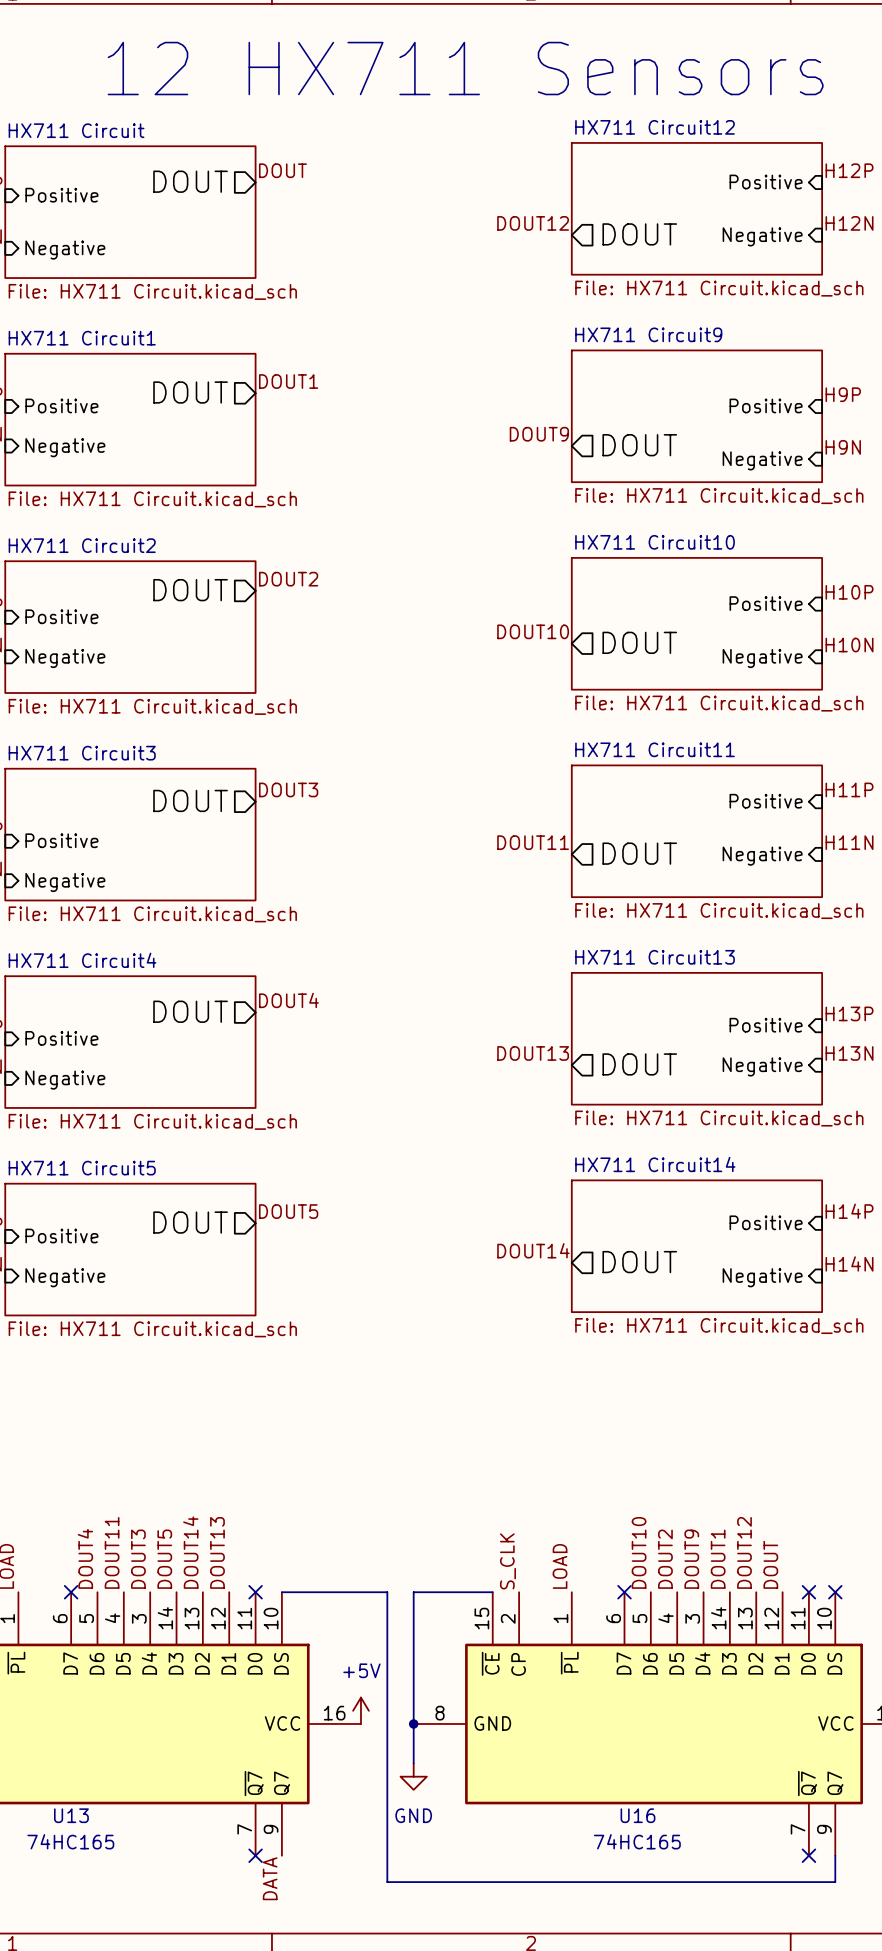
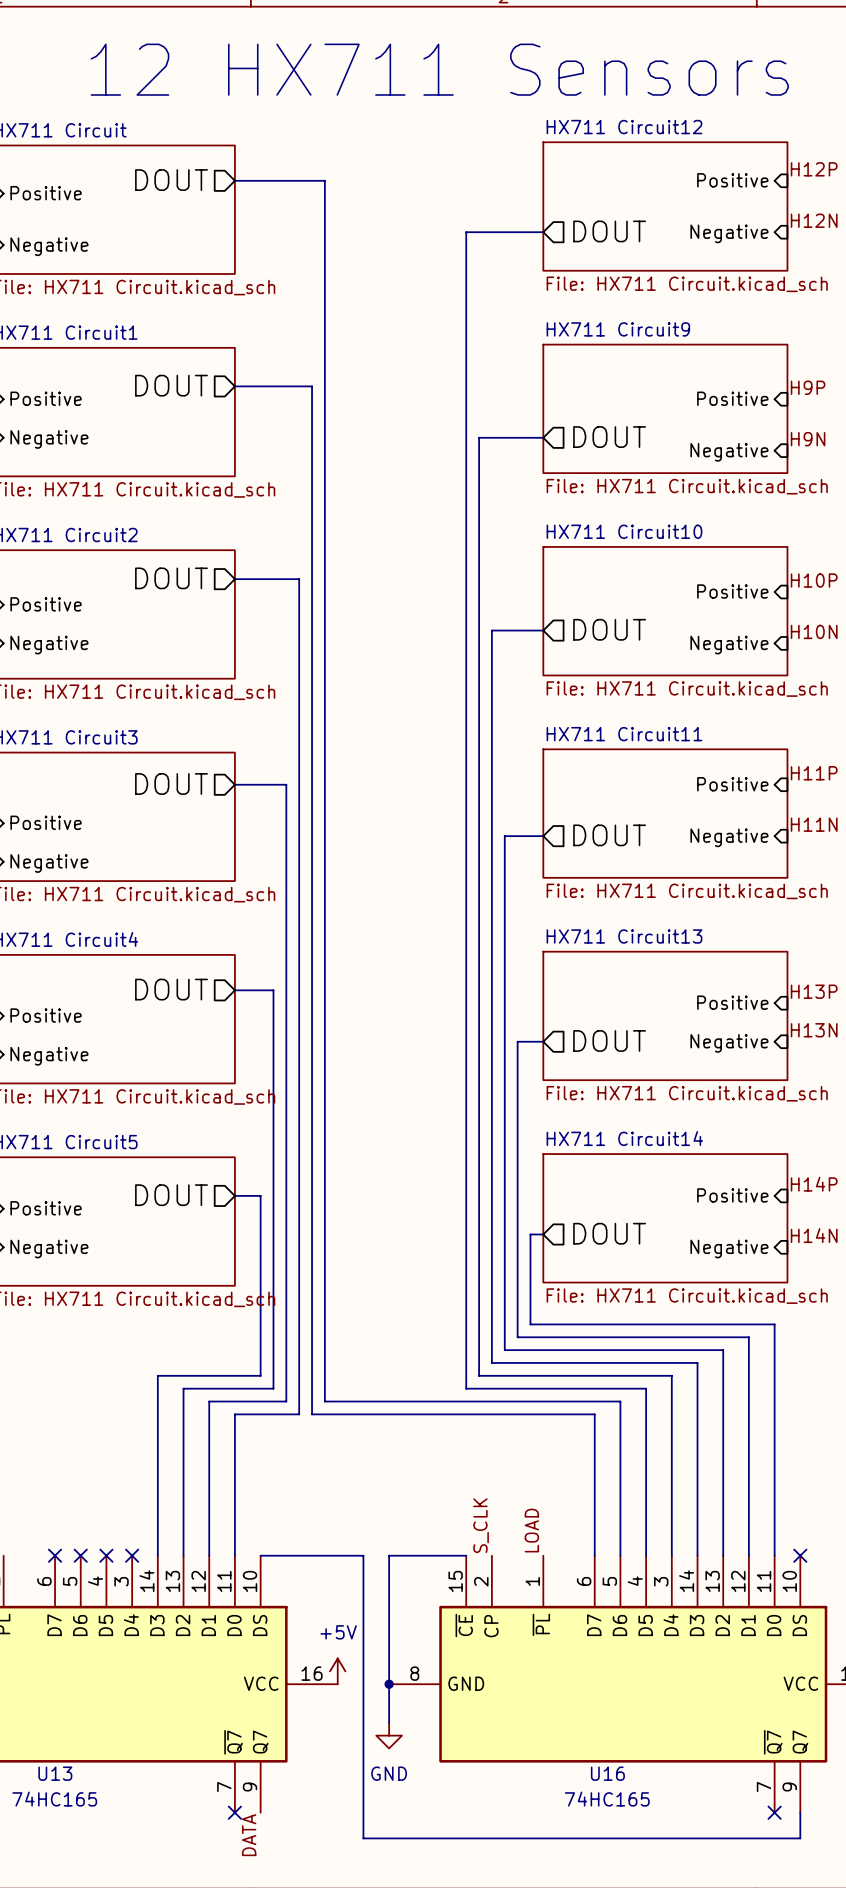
label: DOUT (282, 170) -> none
wire: none -> (234, 180) (324, 180) (324, 1401) (620, 1401) (620, 1555)
label: DOUT12 (533, 223) -> none
wire: none -> (543, 232) (466, 232) (466, 1388) (646, 1388) (646, 1555)
label: DOUT1 (288, 381) -> none
wire: none -> (234, 386) (312, 386) (312, 1414) (594, 1414) (594, 1555)
label: DOUT9 (539, 434) -> none
wire: none -> (543, 437) (479, 437) (479, 1375) (671, 1375) (671, 1555)
label: DOUT2 (288, 579) -> none
wire: none -> (234, 579) (299, 579) (299, 1414) (234, 1414) (234, 1555)
label: DOUT10 (533, 631) -> none
wire: none -> (543, 630) (491, 630) (491, 1362) (697, 1362) (697, 1555)
label: DOUT3 (288, 789) -> none
wire: none -> (234, 784) (286, 784) (286, 1401) (209, 1401) (209, 1555)
label: DOUT11 (533, 842) -> none
wire: none -> (543, 836) (504, 836) (504, 1350) (723, 1350) (723, 1555)
label: DOUT4 (288, 1000) -> none
wire: none -> (234, 990) (273, 990) (273, 1388) (183, 1388) (183, 1555)
label: DOUT13 (533, 1053) -> none
wire: none -> (543, 1041) (517, 1041) (517, 1337) (748, 1337) (748, 1555)
label: DOUT5 (288, 1211) -> none
wire: none -> (234, 1195) (260, 1195) (260, 1375) (157, 1375) (157, 1555)
label: DOUT14 (533, 1250) -> none
wire: none -> (543, 1234) (530, 1234) (530, 1324) (774, 1324) (774, 1555)
label: DOUT11 (112, 1552) -> none
label: DOUT14 (190, 1552) -> none
label: DOUT13 (217, 1552) -> none
label: DOUT10 (639, 1552) -> none
label: DOUT12 (744, 1552) -> none
label: DOUT4 (85, 1558) -> none
label: DOUT3 (138, 1559) -> none
label: DOUT5 (164, 1559) -> none
label: DOUT2 (665, 1559) -> none
label: DOUT9 (691, 1559) -> none
label: DOUT1 (718, 1559) -> none
label: DOUT (770, 1564) -> none
no-connect mark: none -> (80, 1555)
no-connect mark: none -> (106, 1555)
no-connect mark: none -> (132, 1555)
no-connect mark: (255, 1592) -> none
no-connect mark: (624, 1592) -> none
no-connect mark: (808, 1592) -> none

